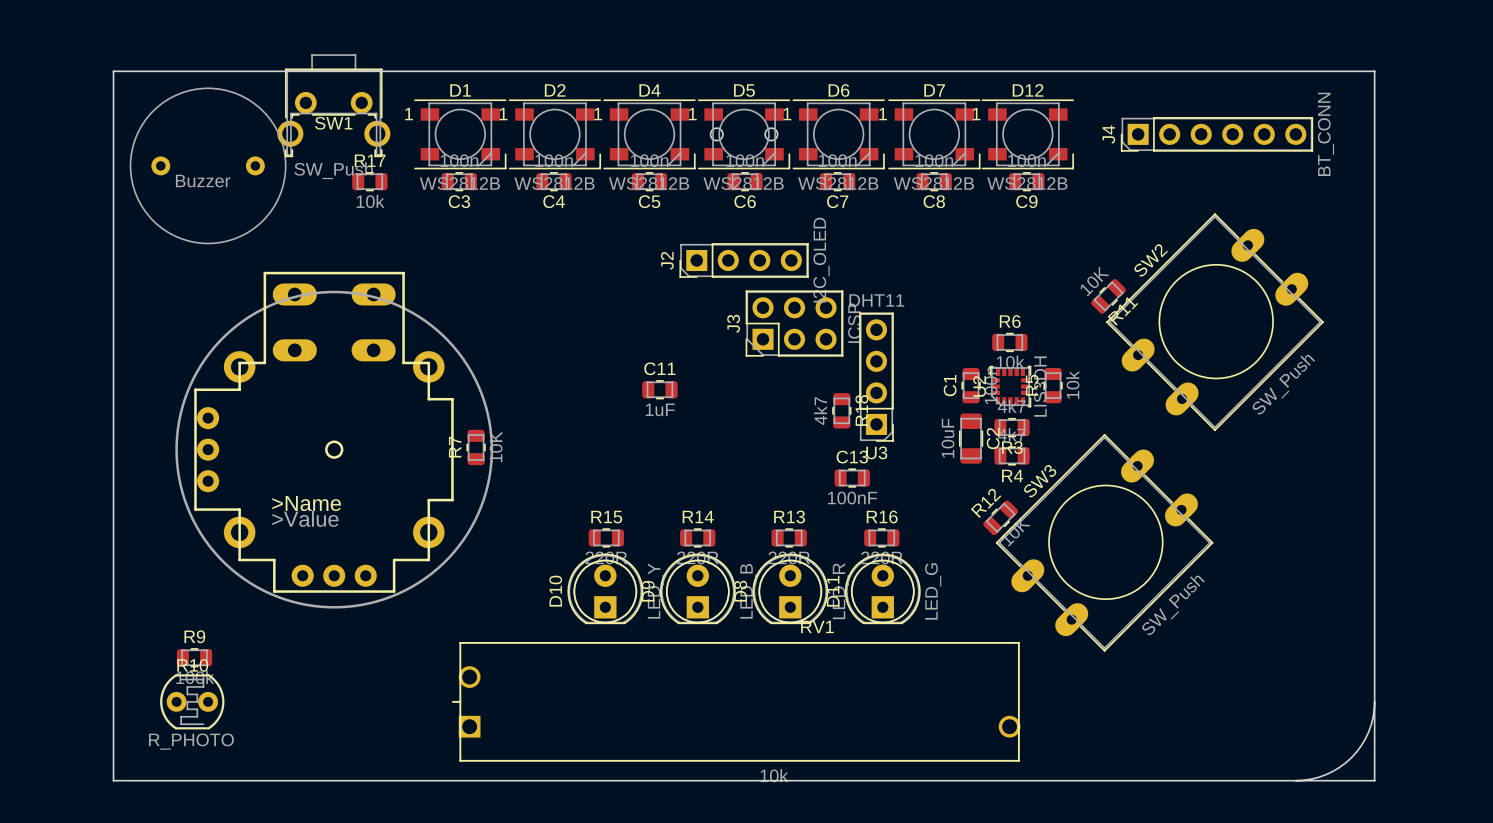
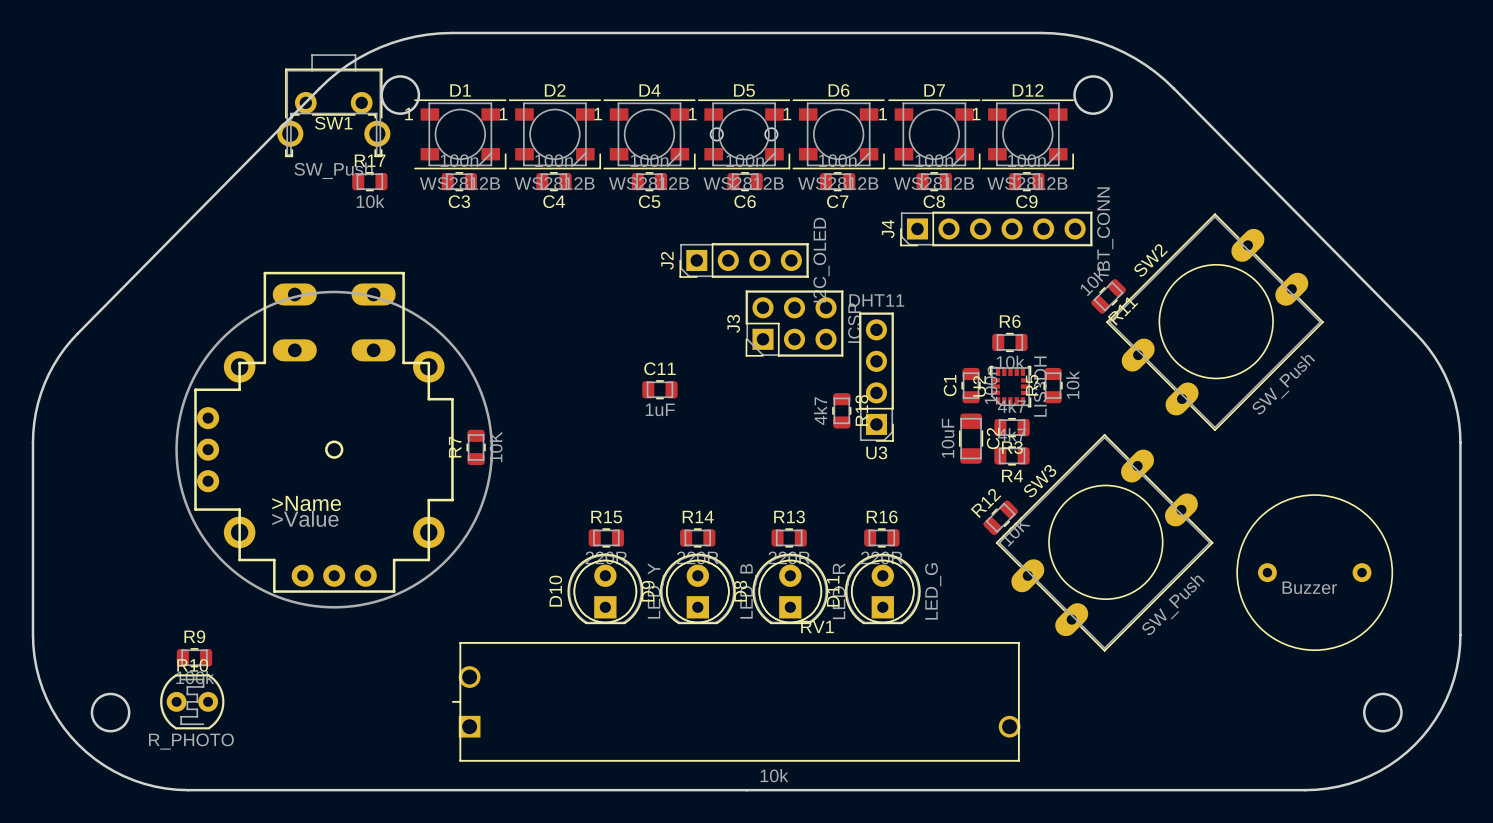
board edge: (113, 71) (113, 780) (1374, 780) (1374, 71) (113, 71) -> (452, 32) (427, 34) (391, 43) (358, 58) (328, 79) (77, 333) (58, 357) (48, 374) (38, 402) (33, 432) (34, 657) (42, 689) (57, 718) (70, 736) (95, 759) (113, 771) (133, 780) (155, 786) (188, 790) (1305, 790) (1338, 786) (1369, 776) (1389, 765) (1406, 752) (1429, 727) (1441, 709) (1450, 689) (1456, 667) (1460, 646) (1460, 432) (1455, 402) (1448, 383) (1434, 357) (1415, 333) (1173, 88) (1145, 64) (1124, 52) (1101, 43) (1077, 36) (1053, 33) (452, 32)
round board edge: none -> [380, 75, 421, 115]
round board edge: none -> [1073, 75, 1113, 115]
J4 position: (1216, 134) -> (996, 228)
part: Buzzer (208, 165) -> none
C13: 100nF (852, 478) -> none
part: none -> Buzzer (1314, 572)
round board edge: none -> [90, 692, 131, 733]
round board edge: none -> [1362, 692, 1403, 733]
board edge: (1374, 701) (1373, 717) (1368, 732) (1361, 745) (1351, 757) (1339, 767) (1325, 774) (1311, 779) (1295, 780) -> none

